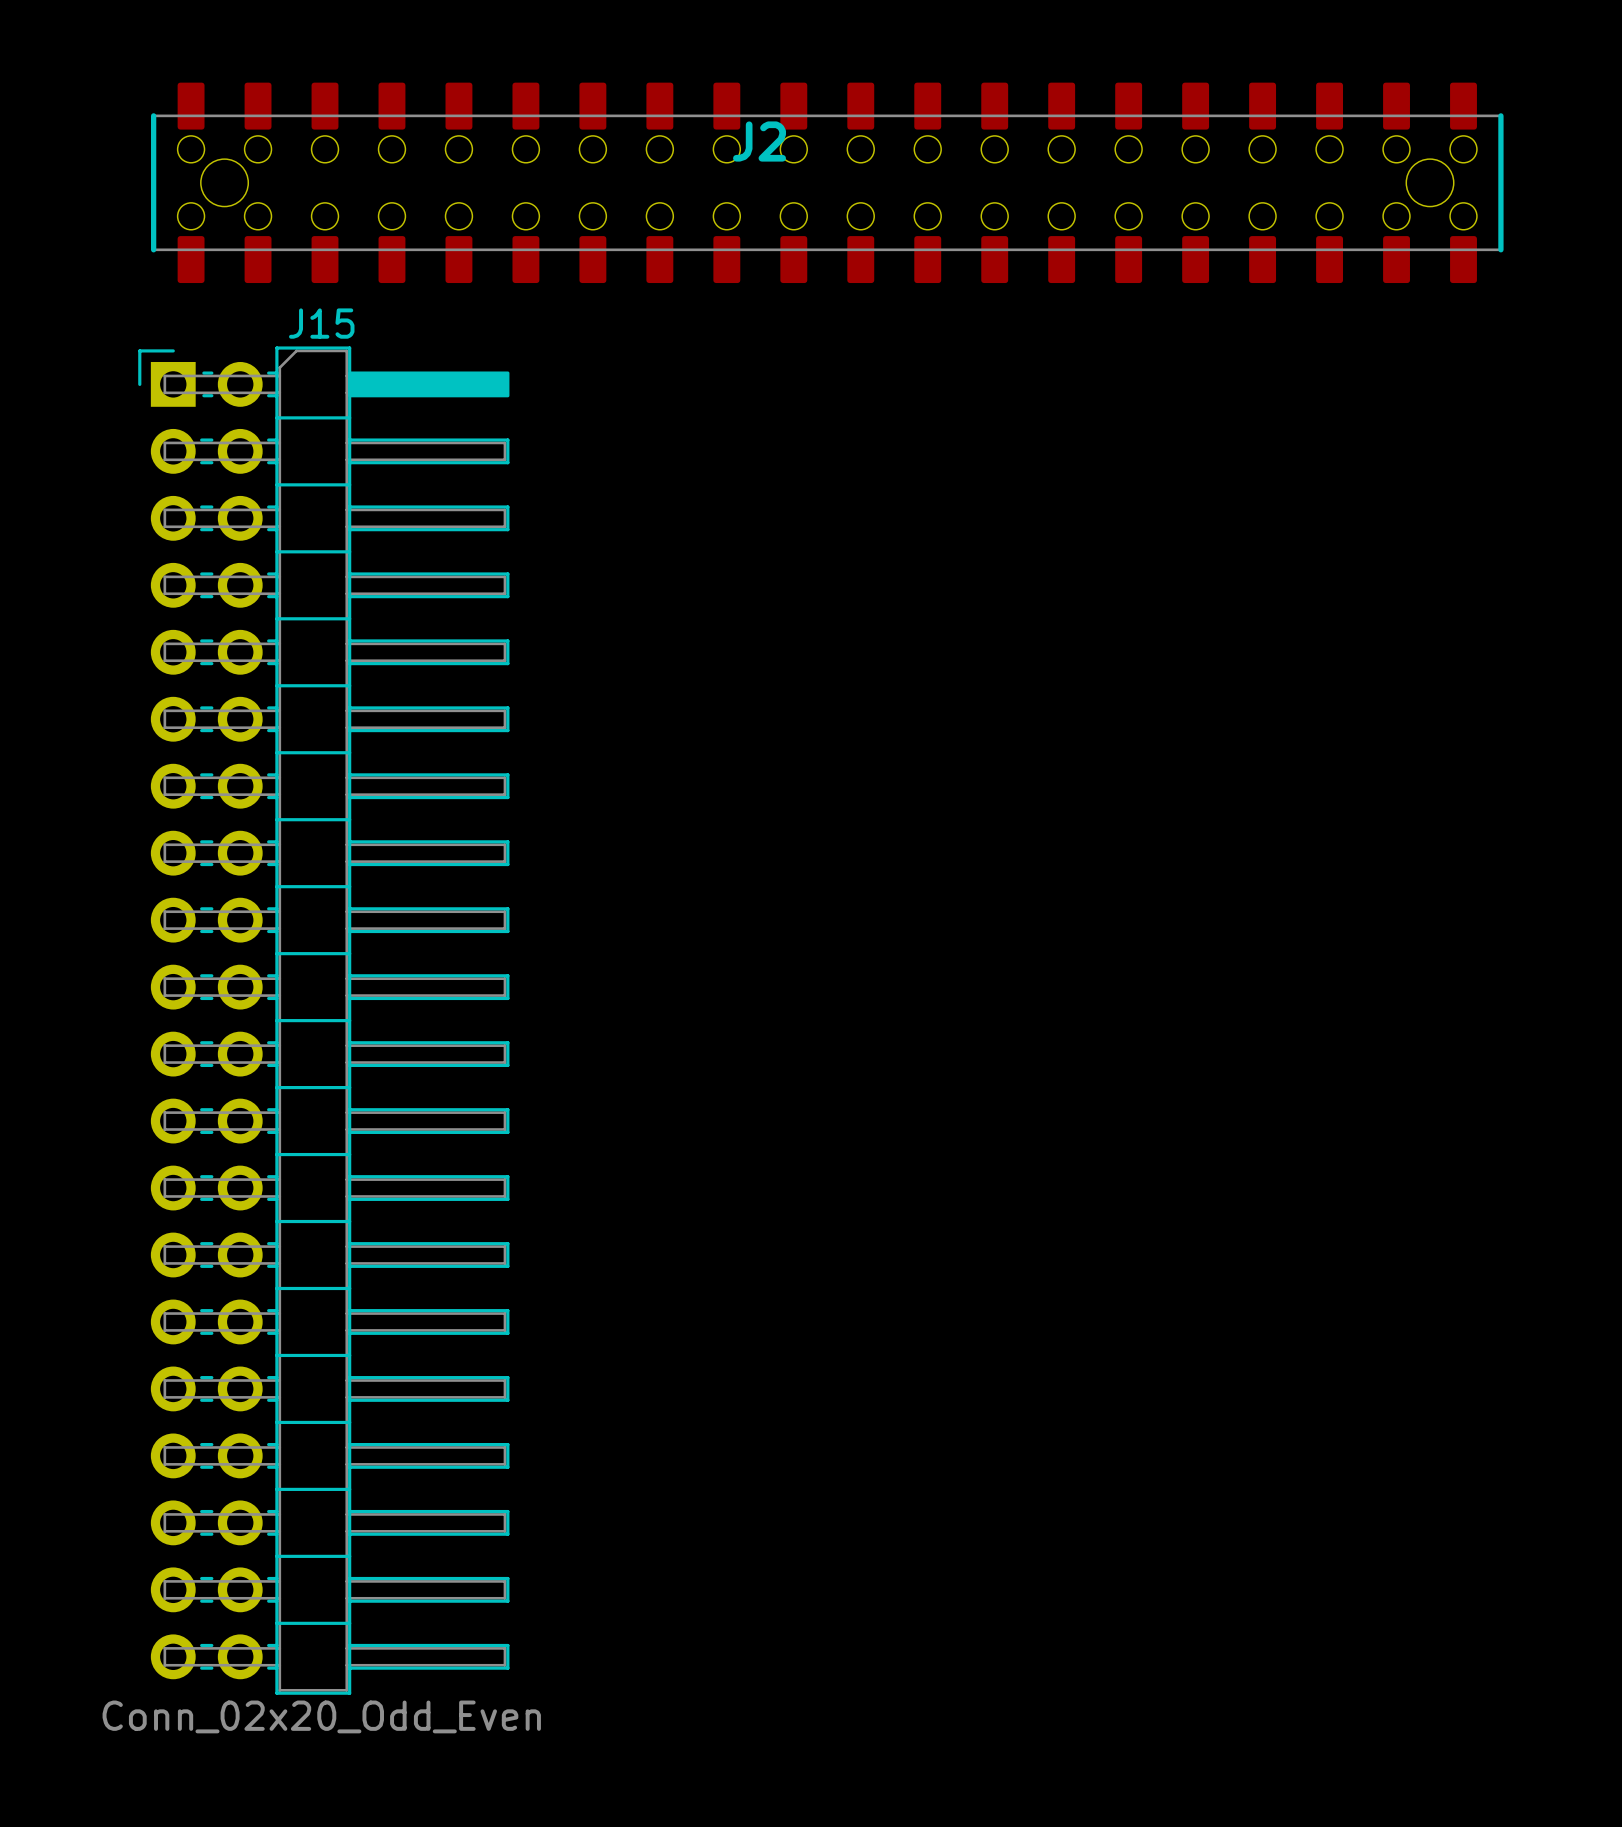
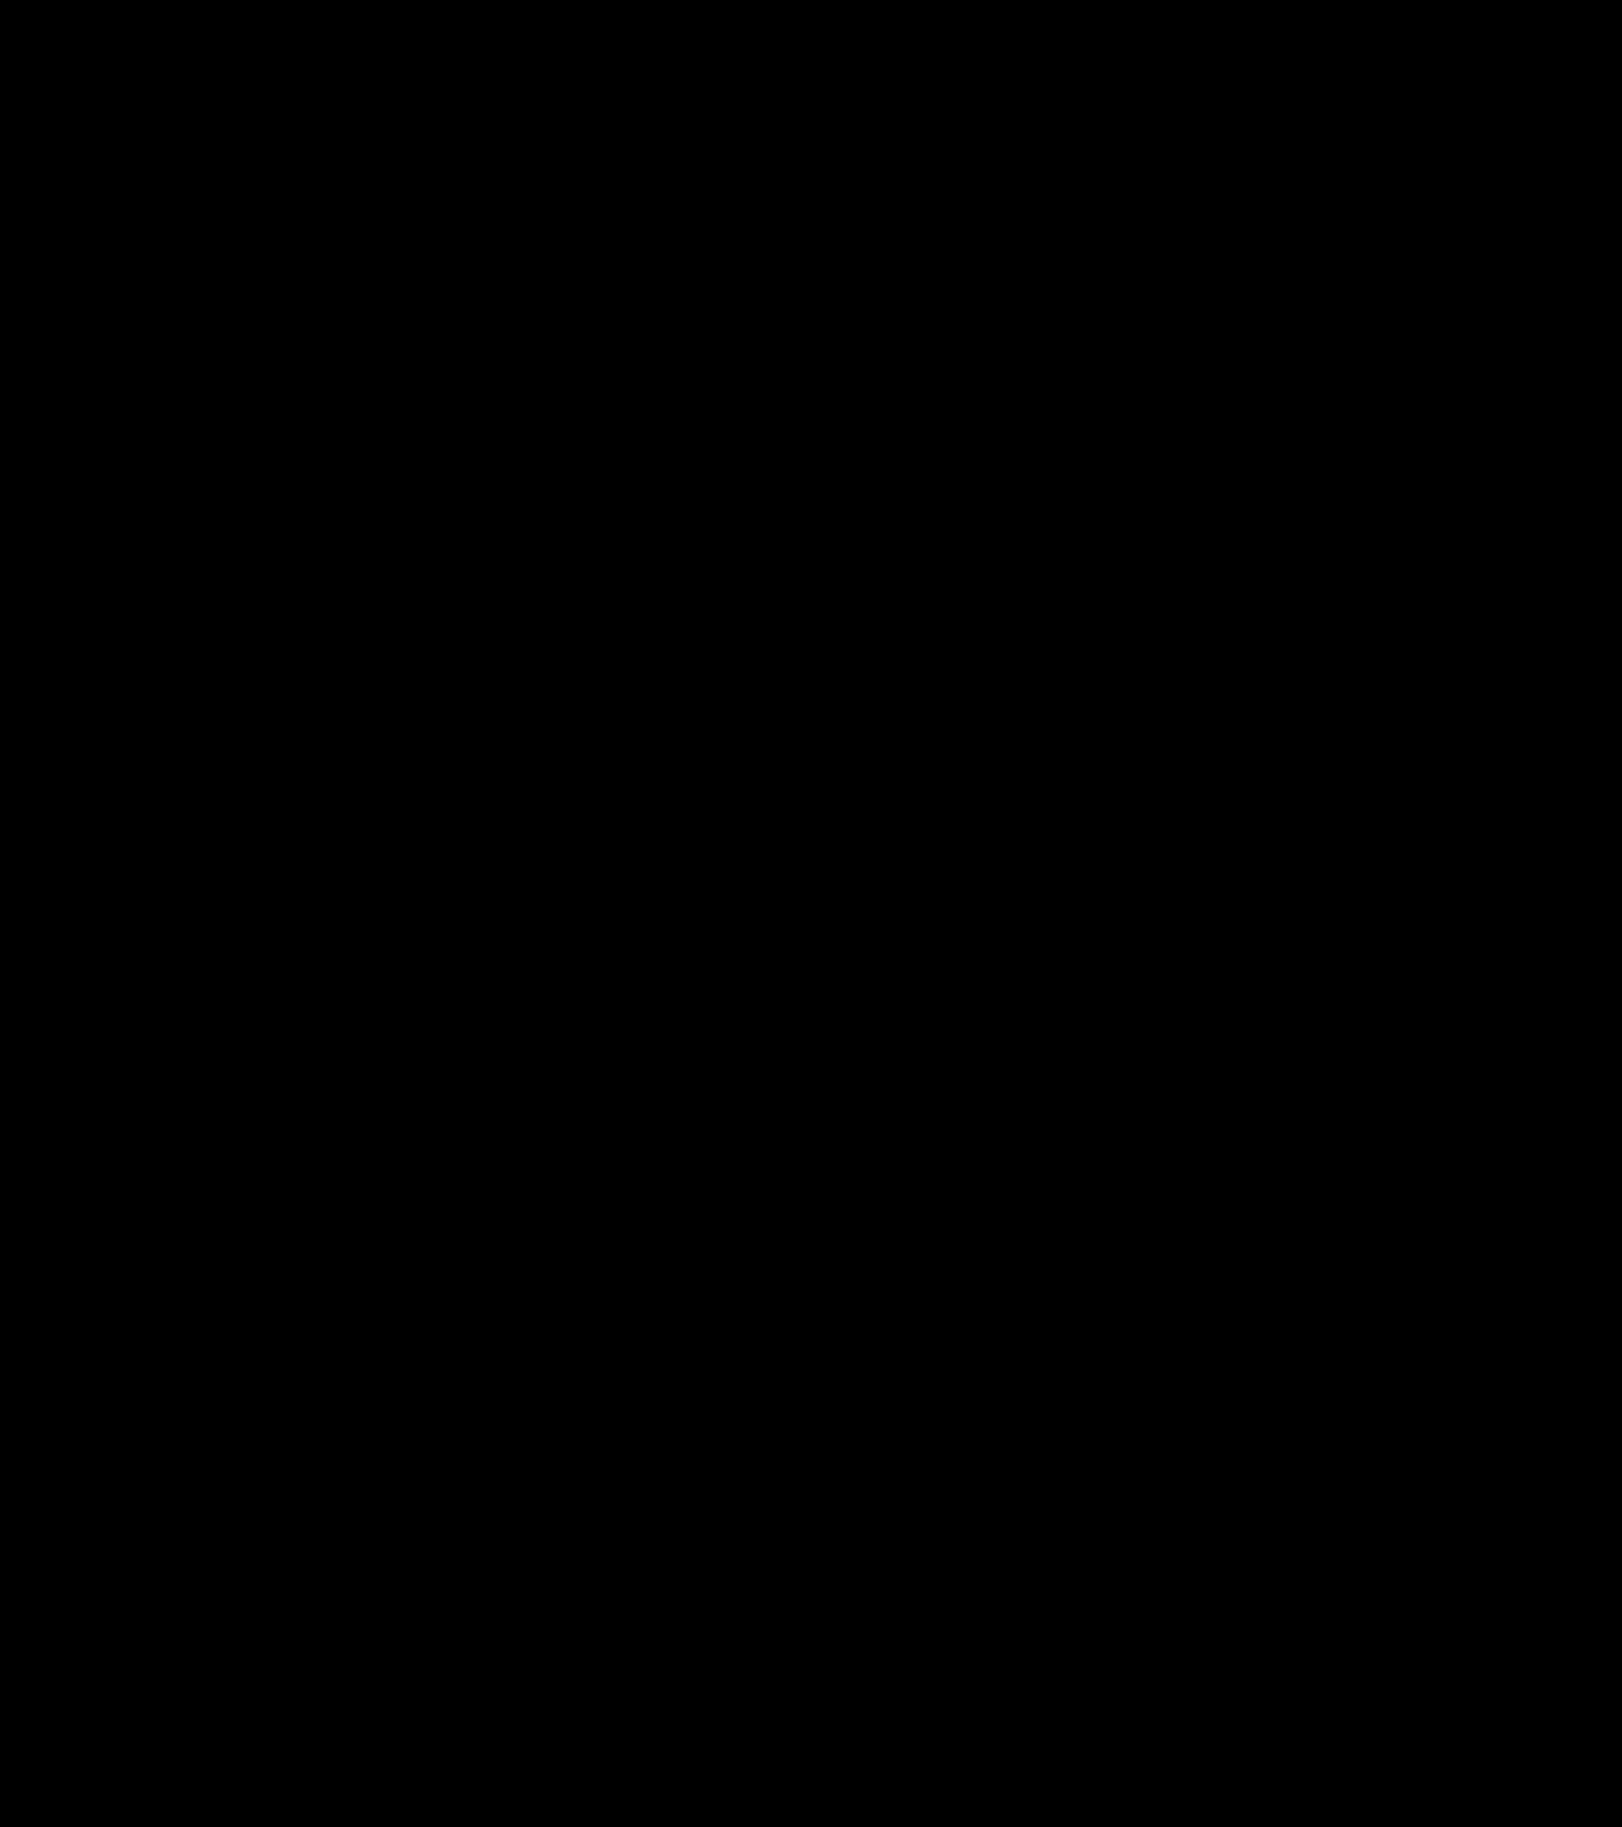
J2: (827, 182) -> none
J15: Conn_02x20_Odd_Even (323, 1020) -> none

